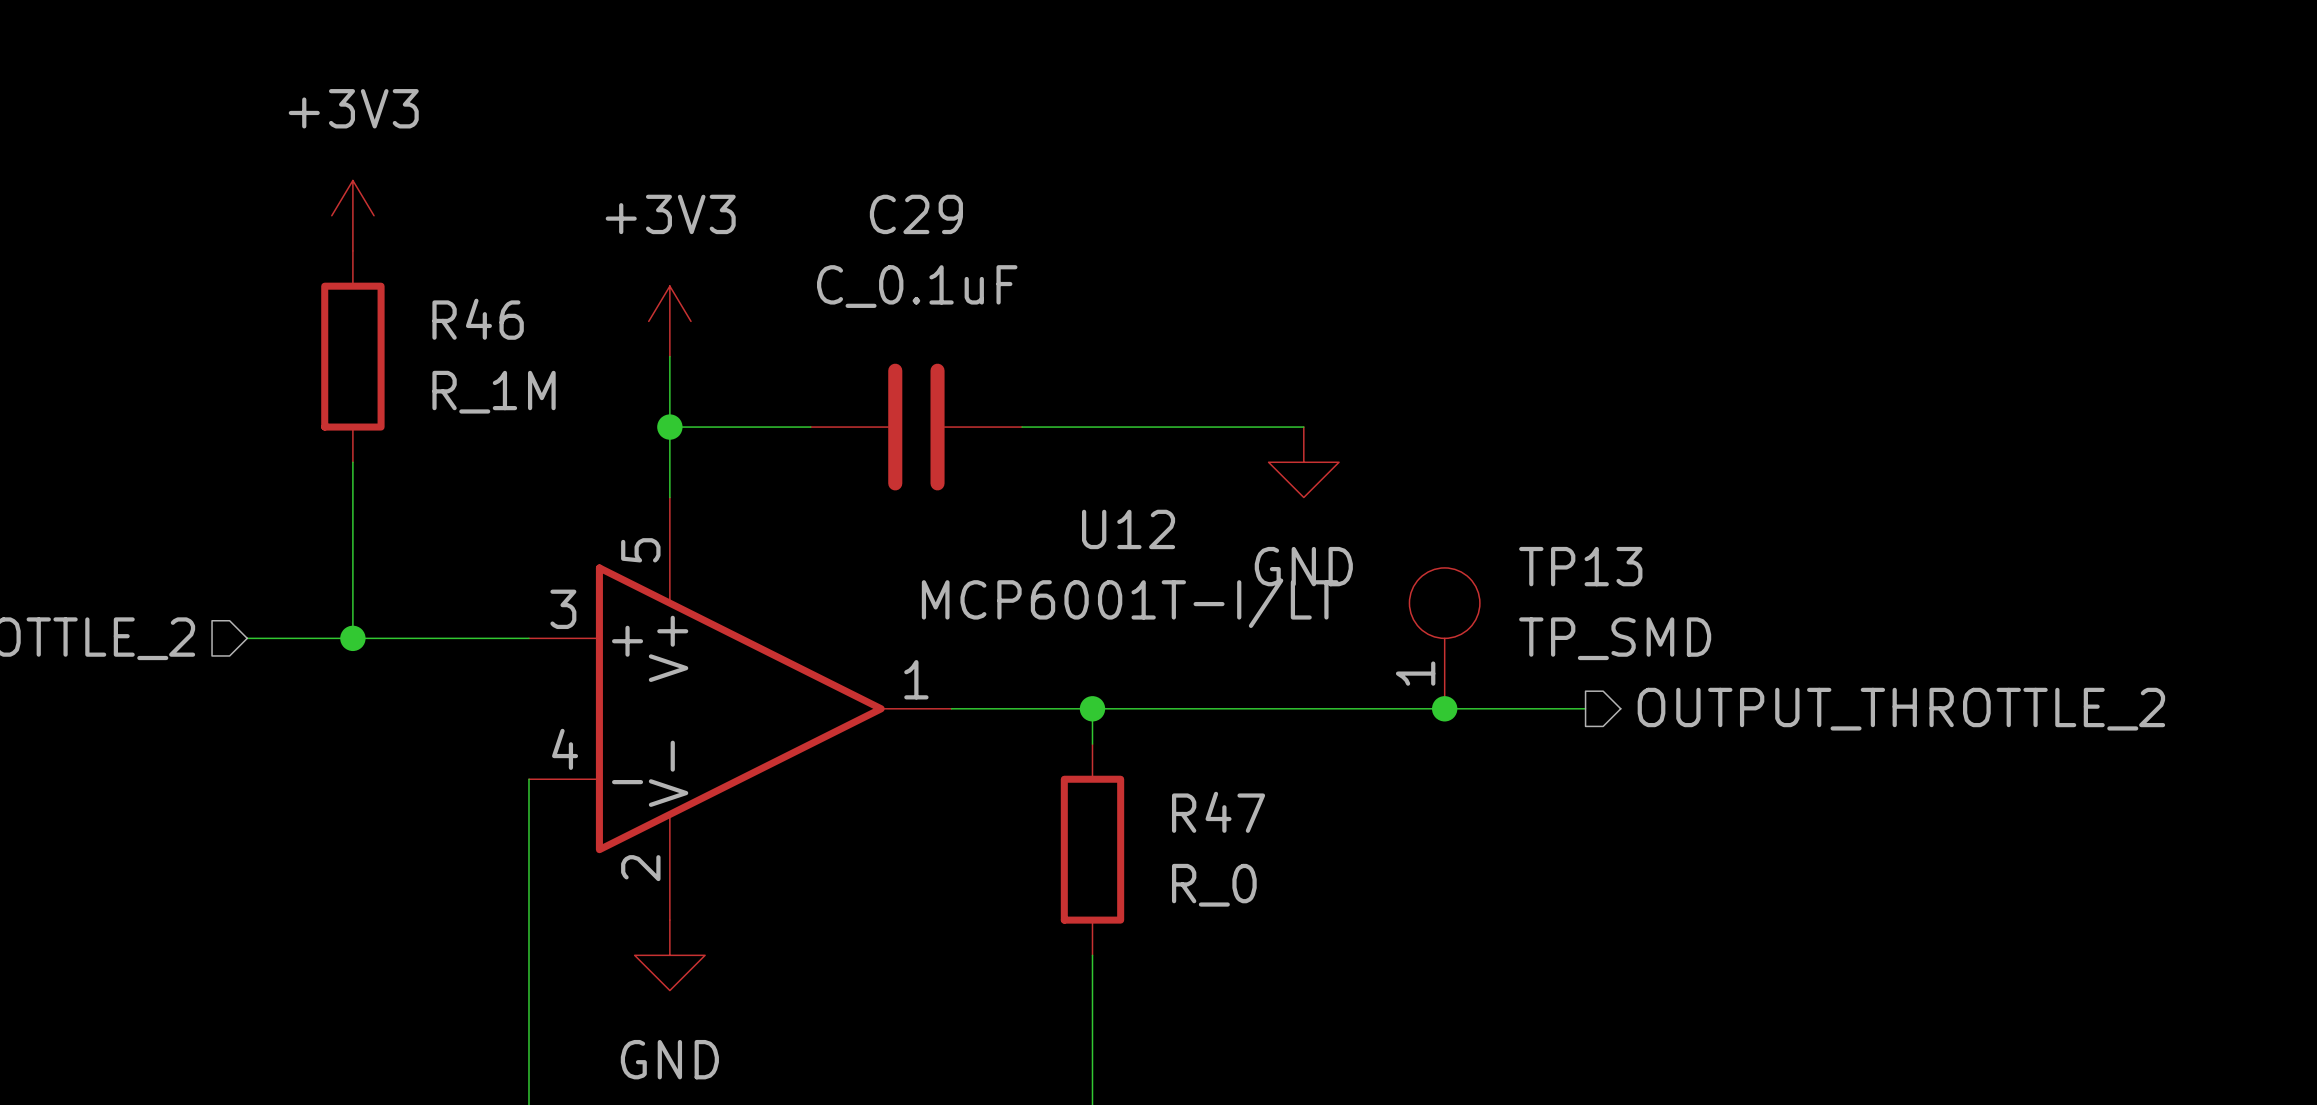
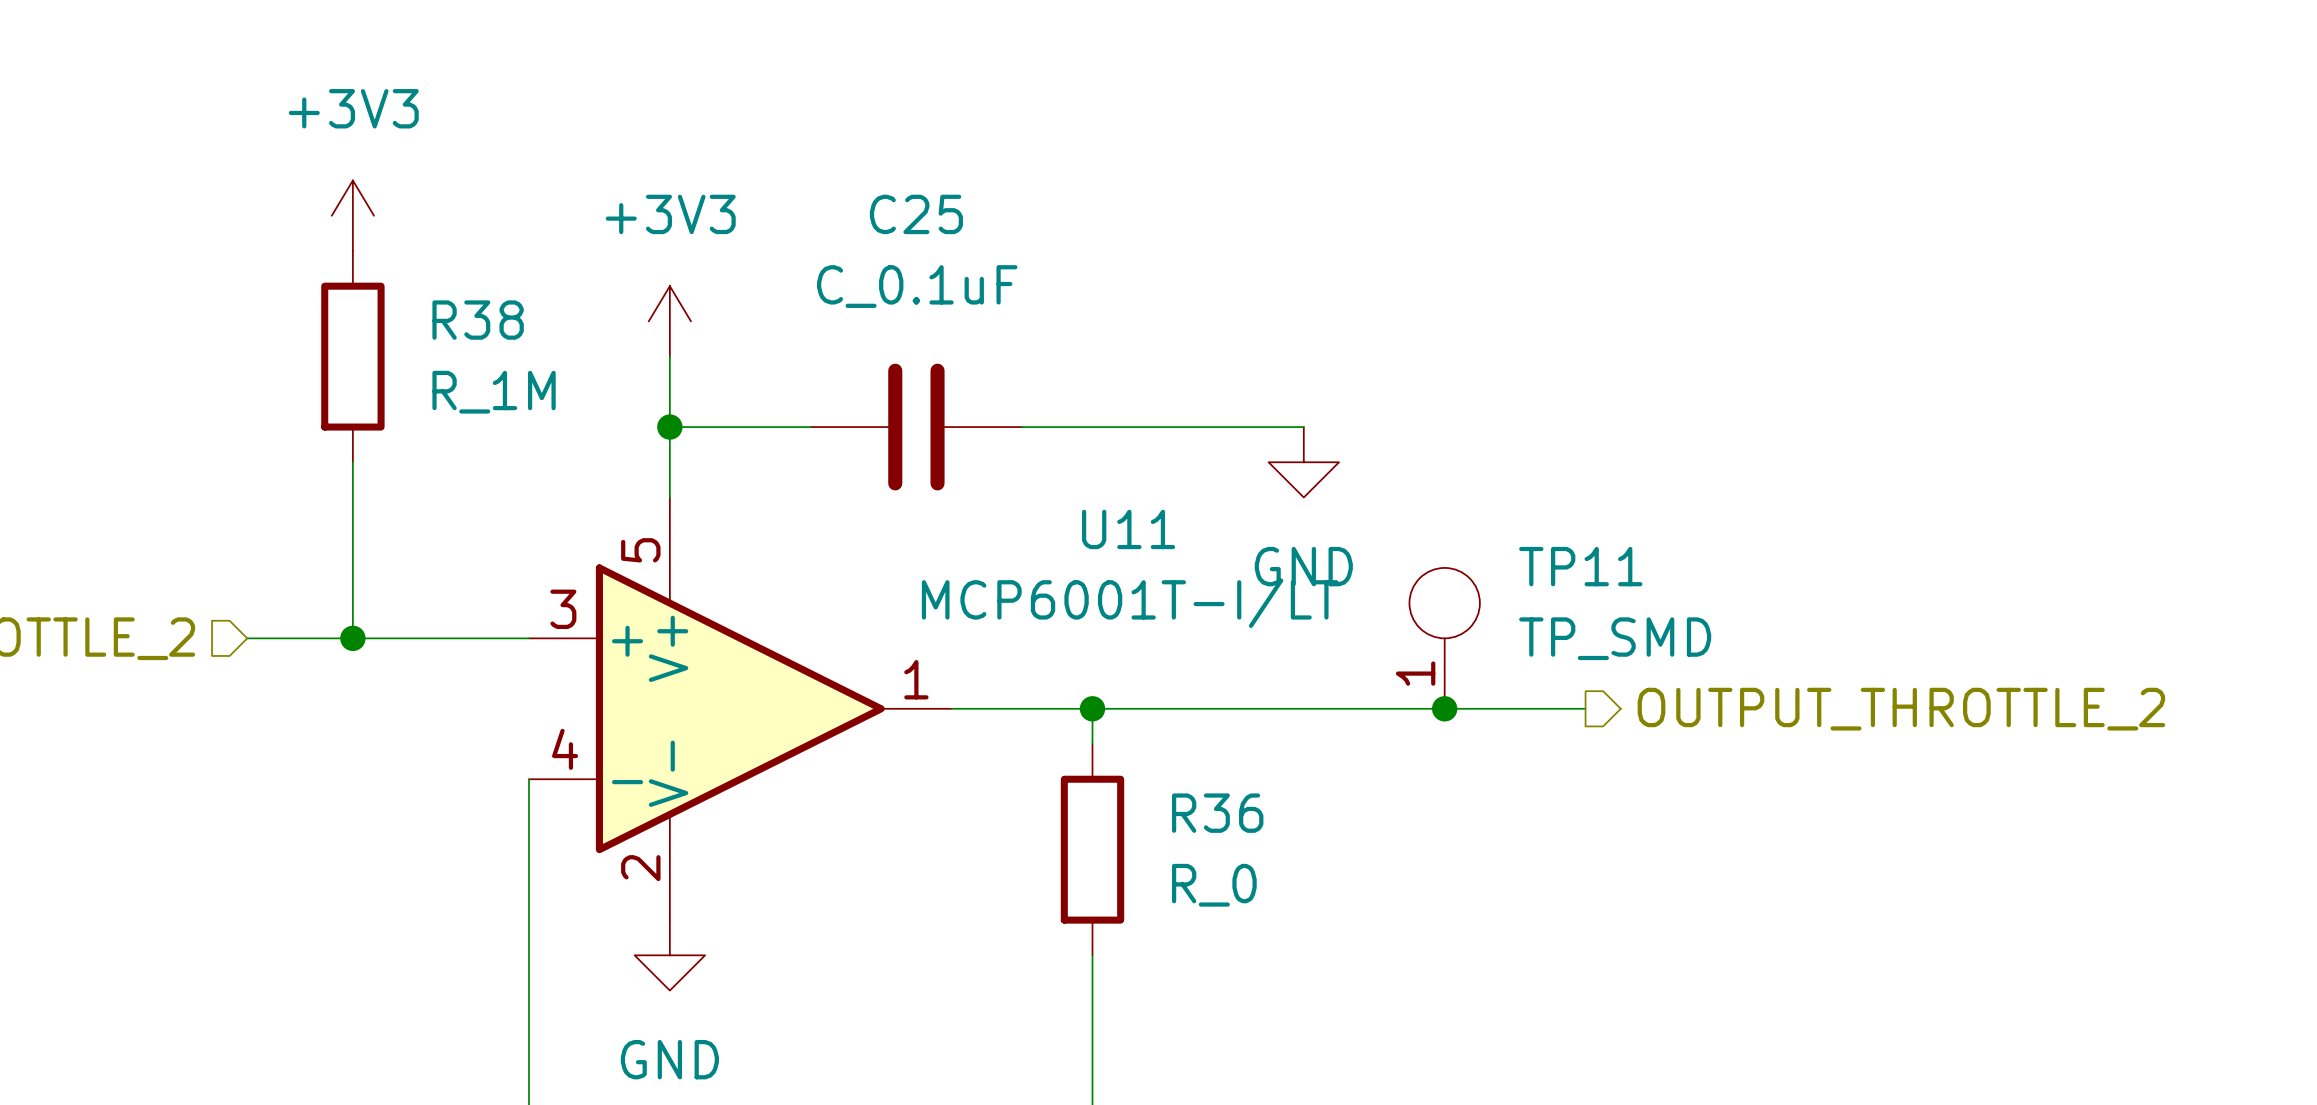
C29 name: C29 (916, 214) -> C25 (916, 214)
R46 name: R46 (478, 319) -> R38 (478, 320)
U12 name: U12 (1128, 529) -> U11 (1128, 529)
TP13 name: TP13 (1580, 566) -> TP11 (1580, 566)
R47 name: R47 (1218, 812) -> R36 (1217, 813)

